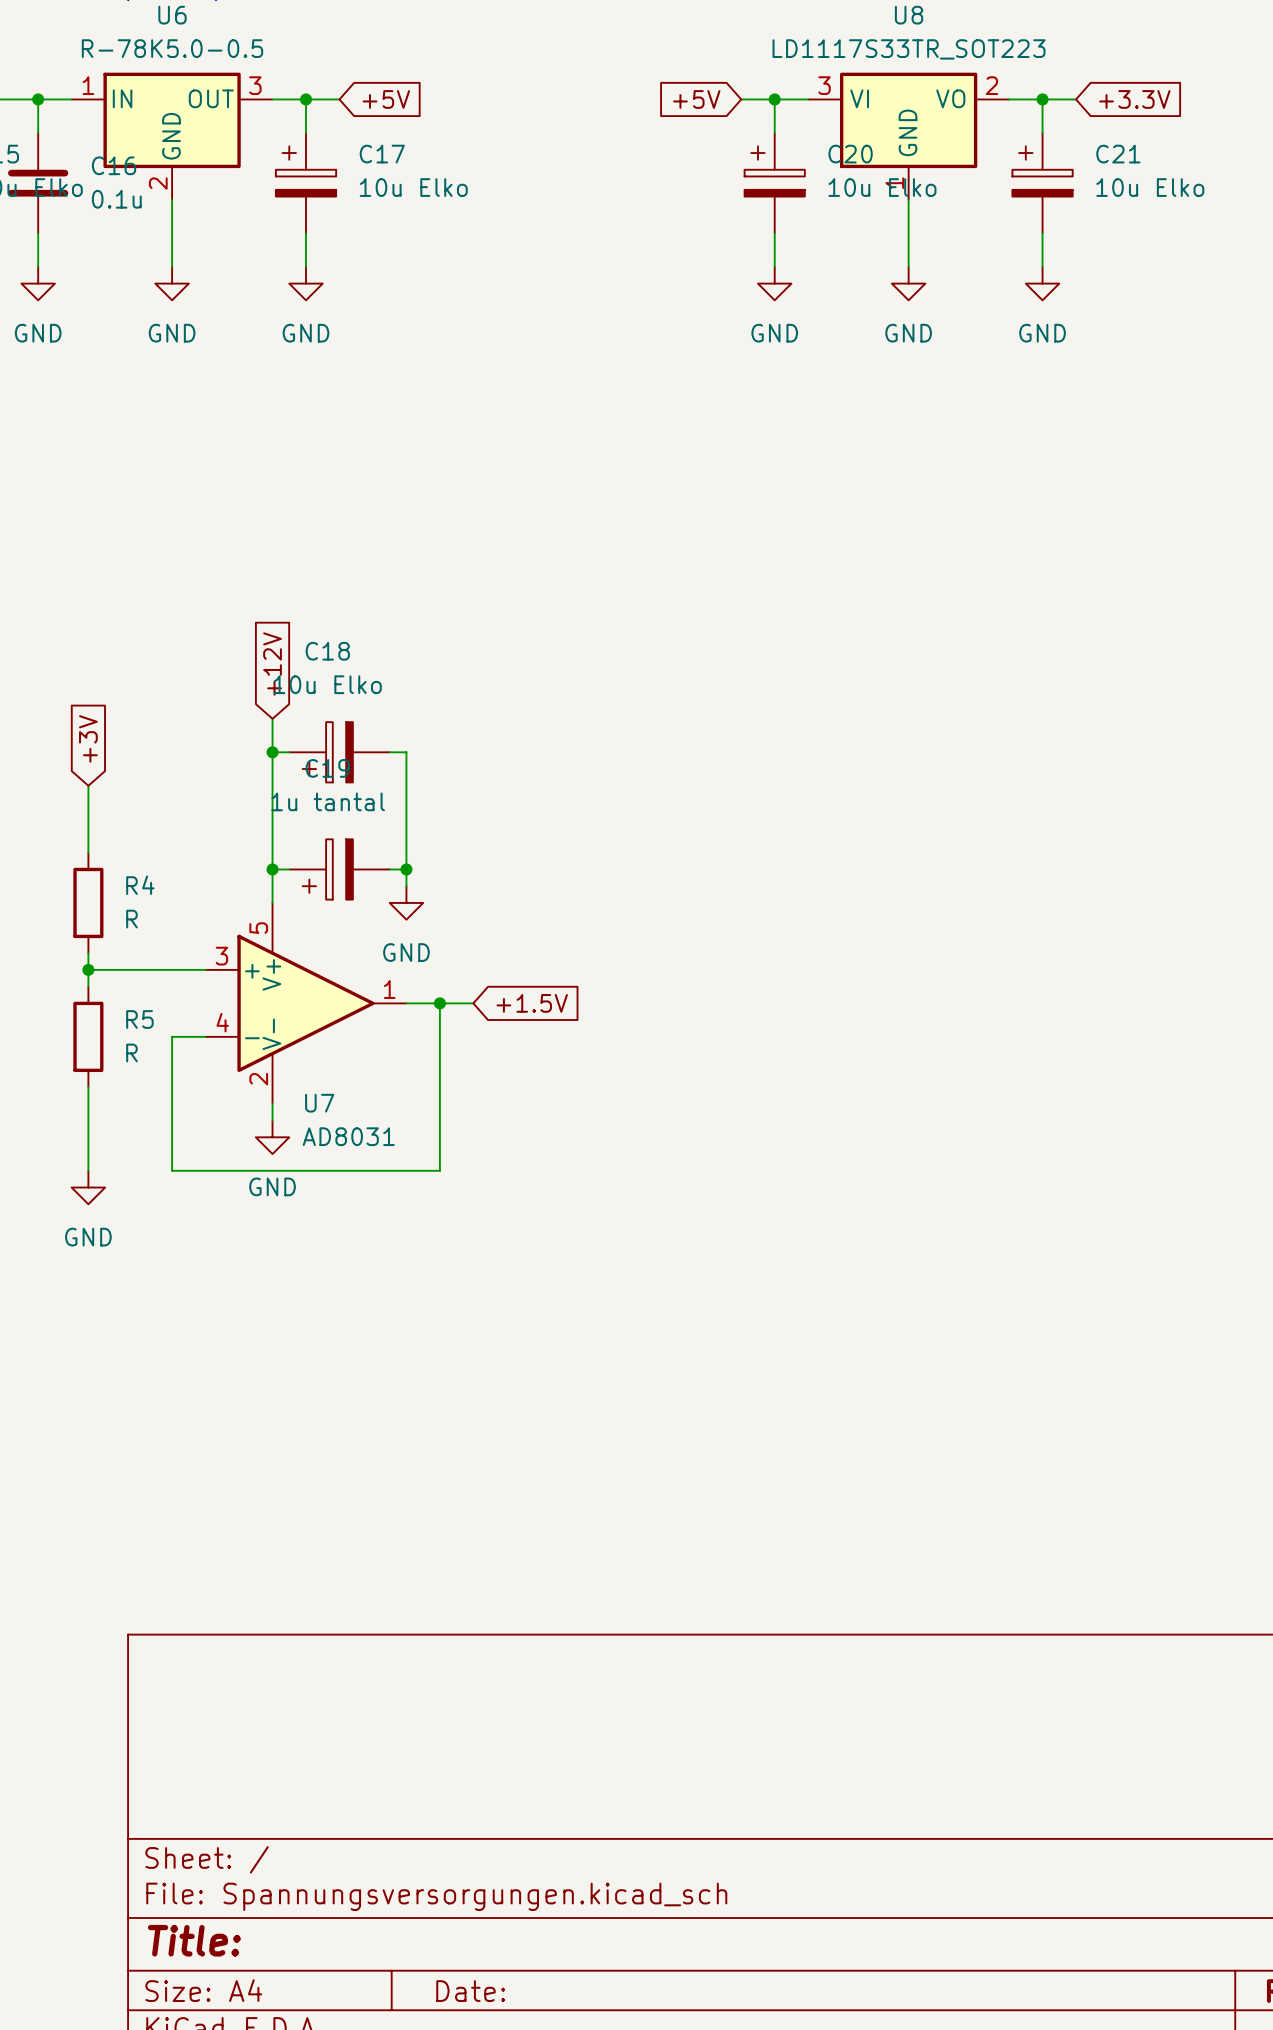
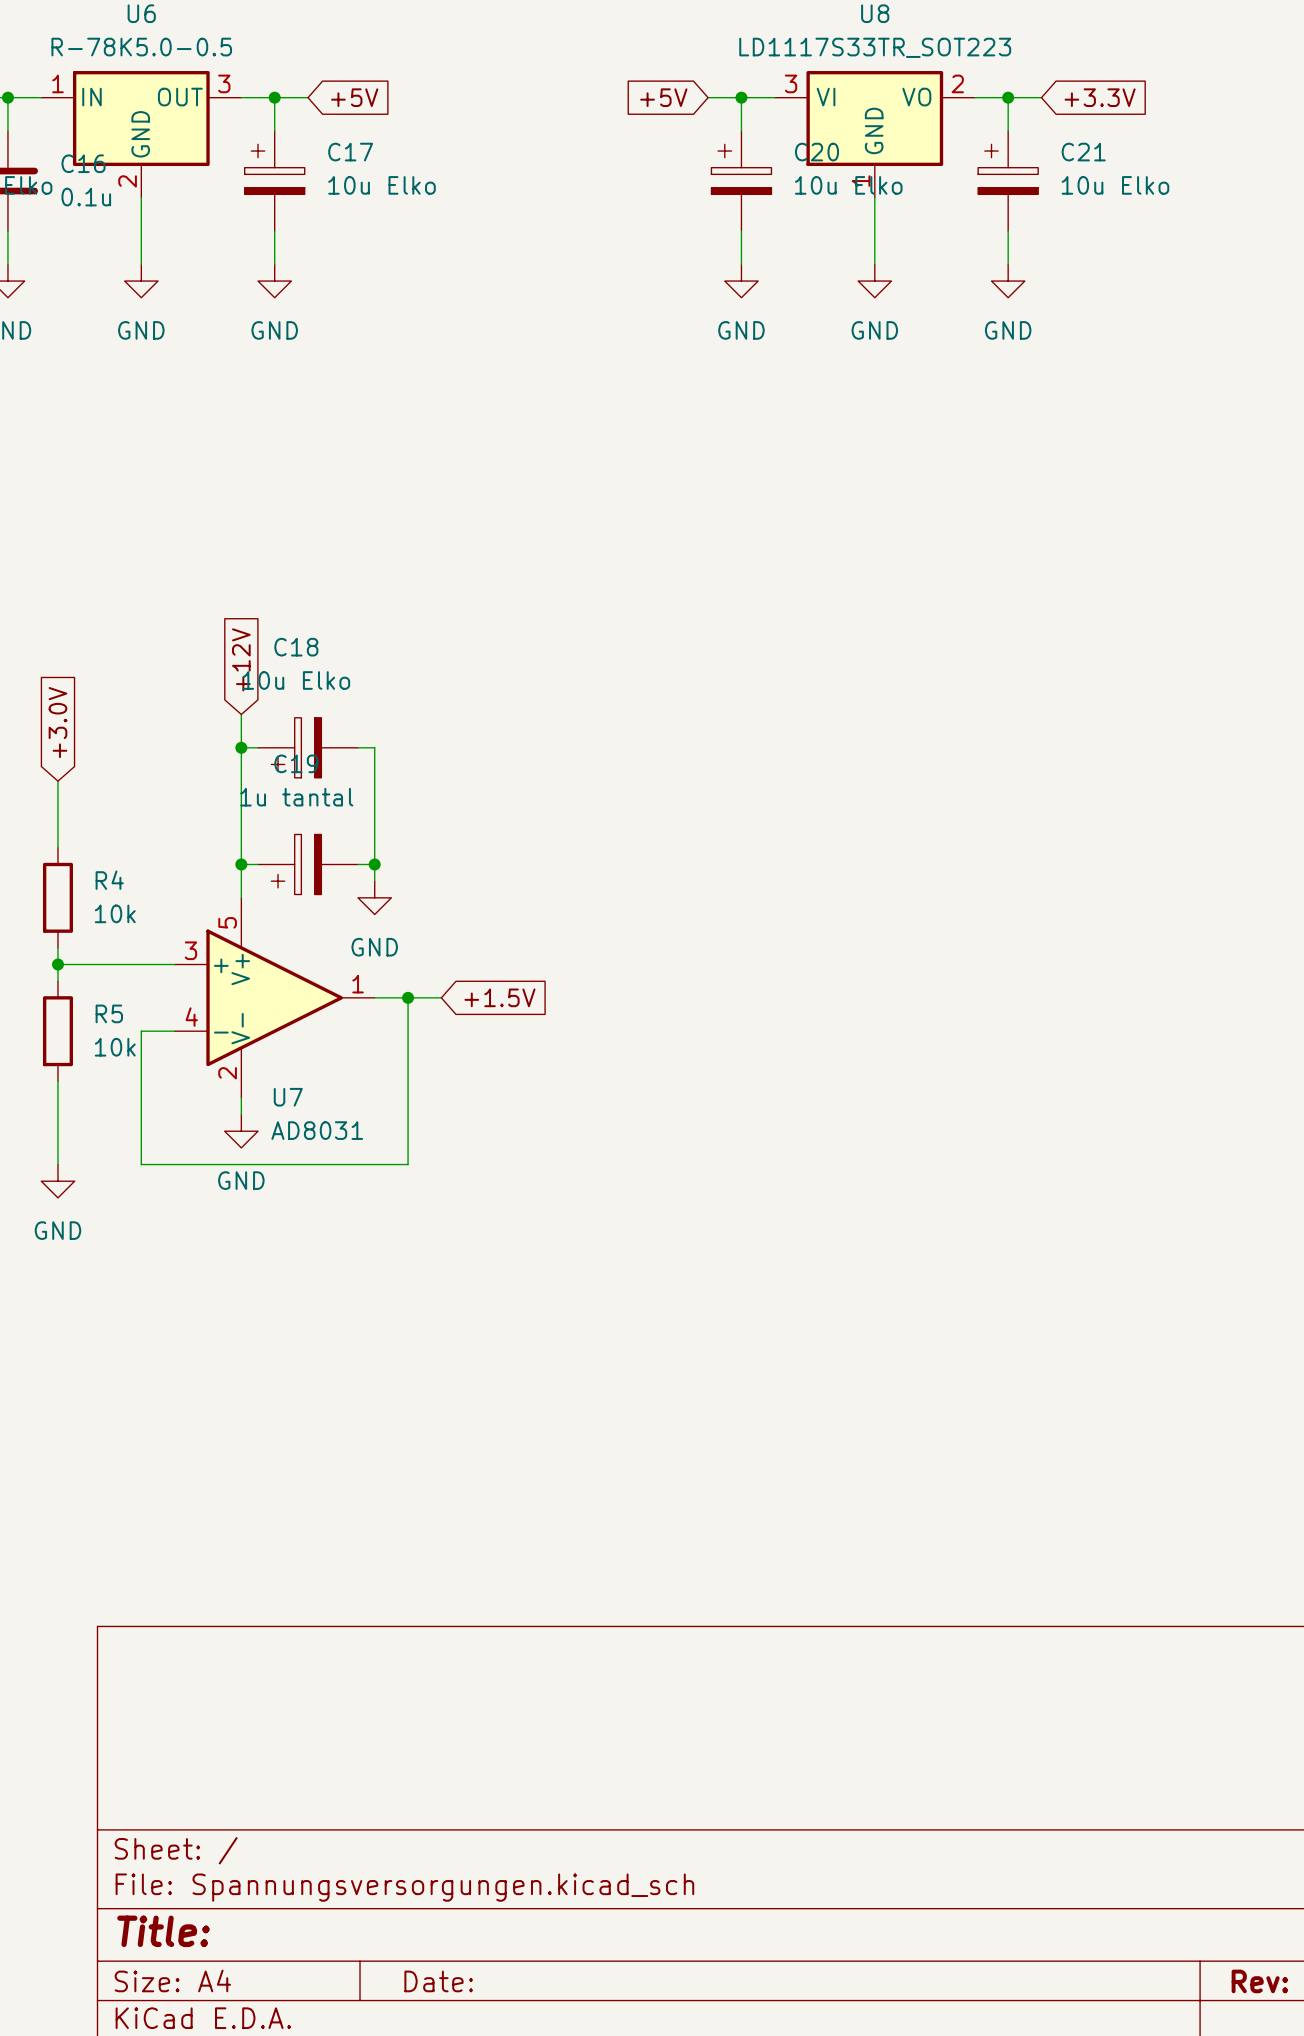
global label: +3V (88, 738) -> +3.0V (57, 722)
R4 value: R (131, 919) -> 10k (115, 913)
R5 value: R (131, 1052) -> 10k (115, 1047)

